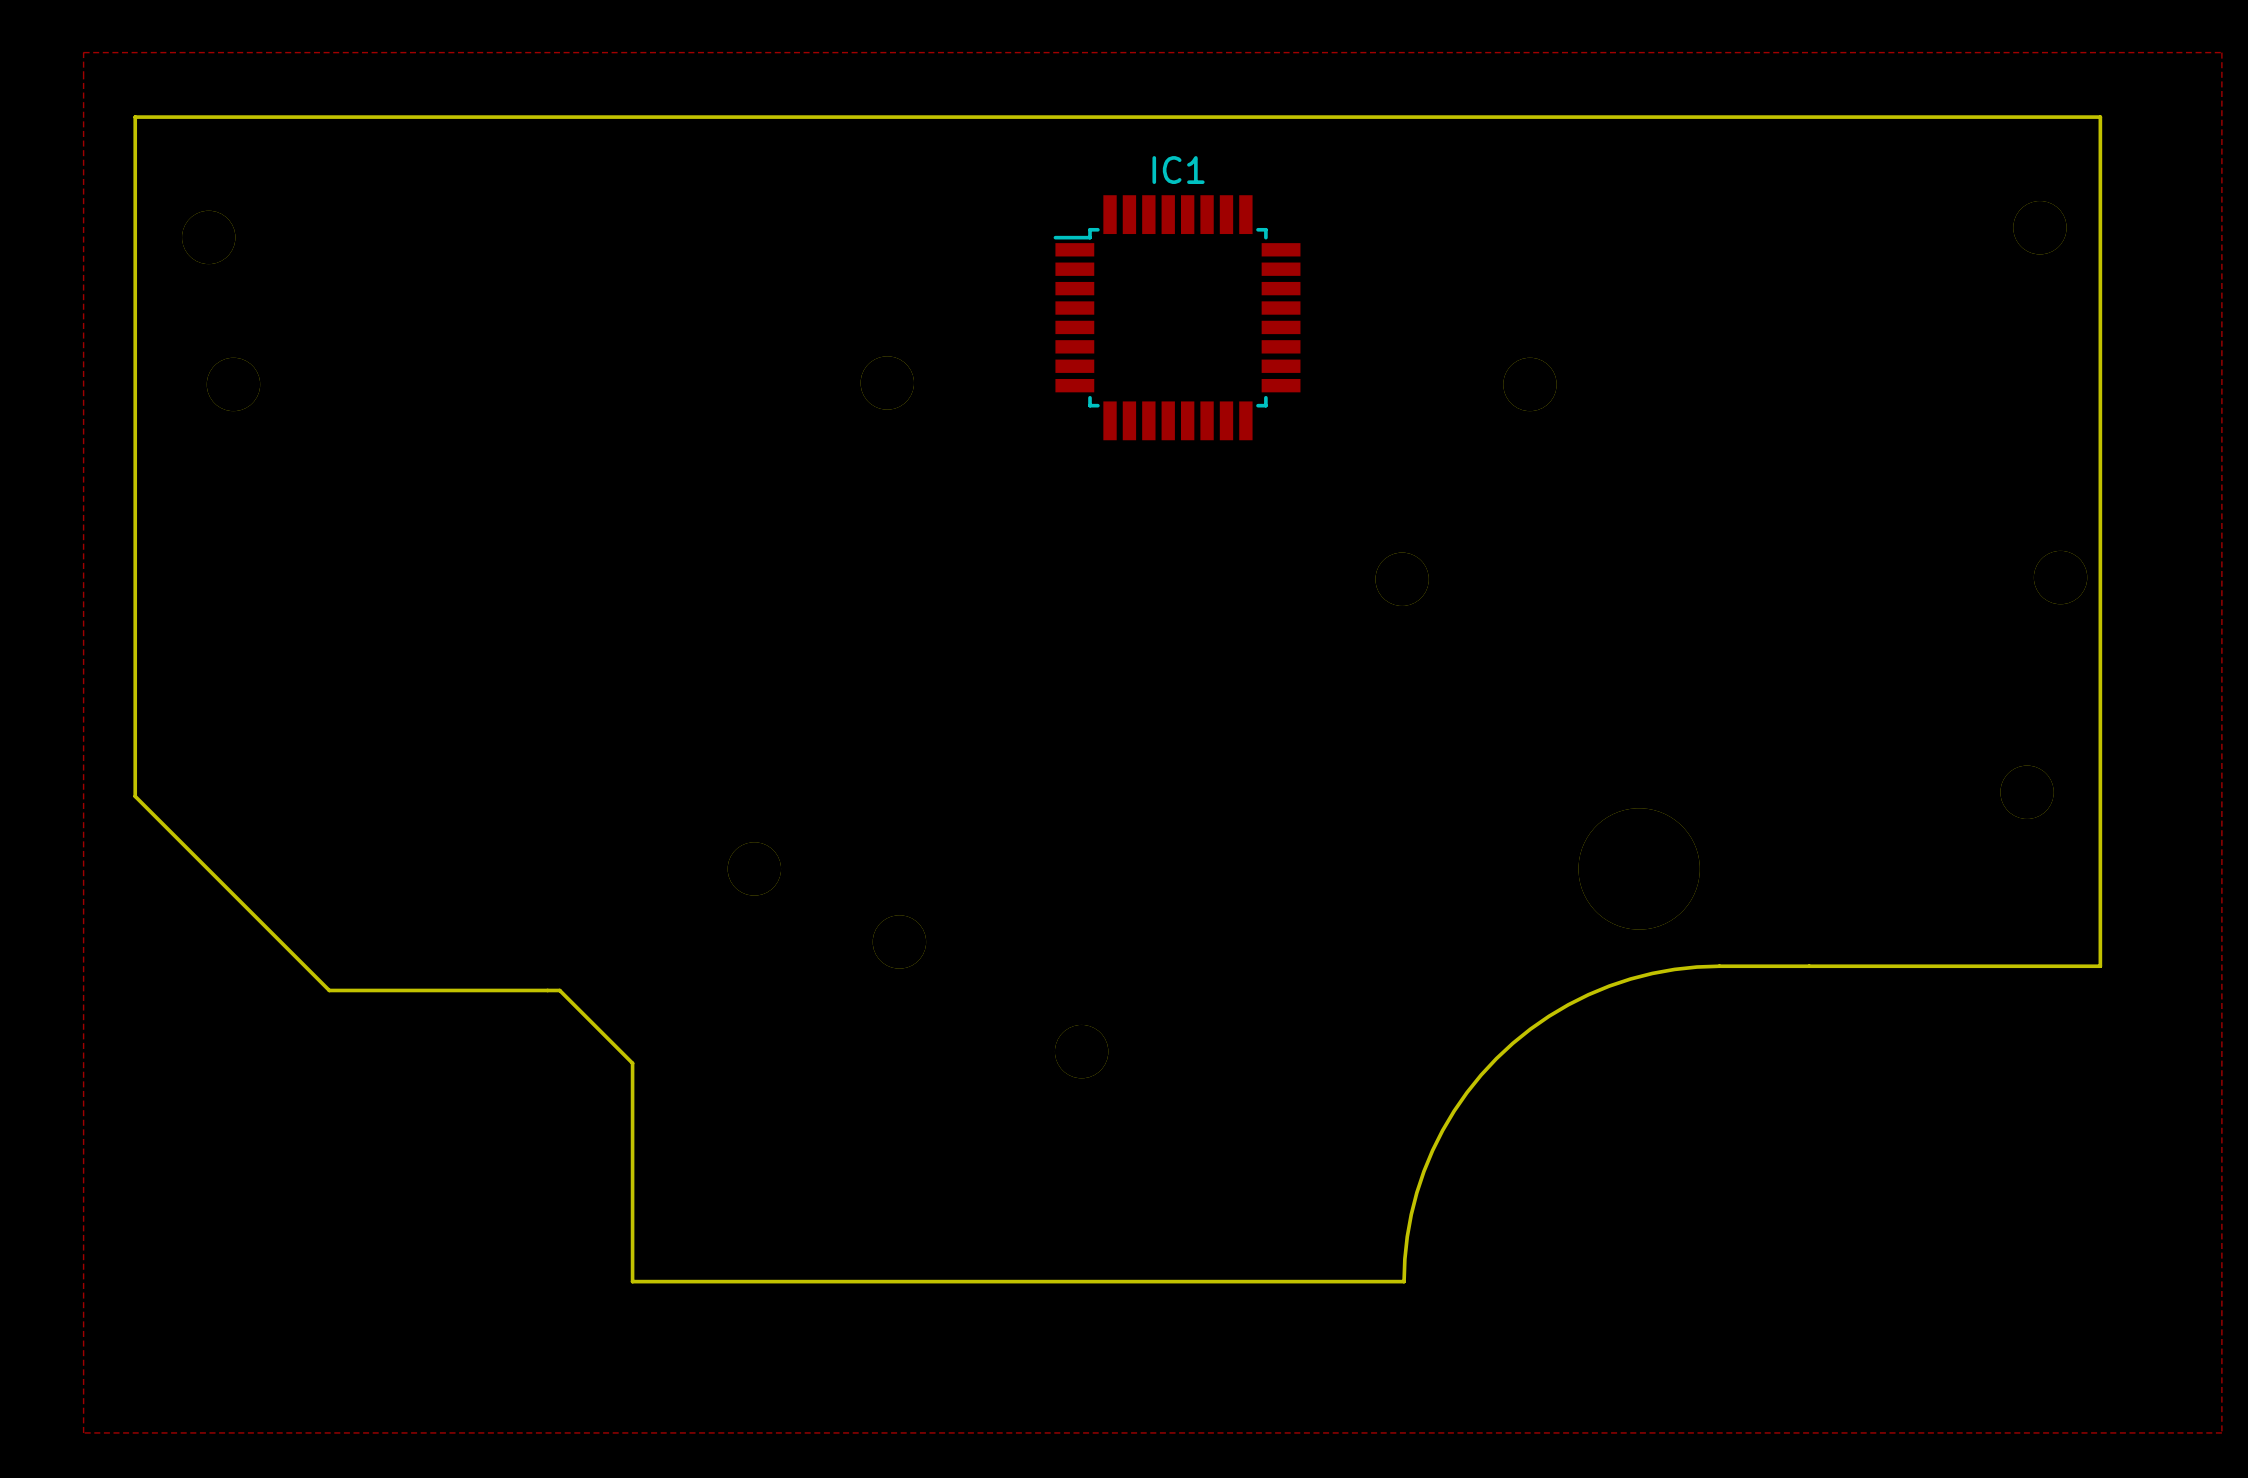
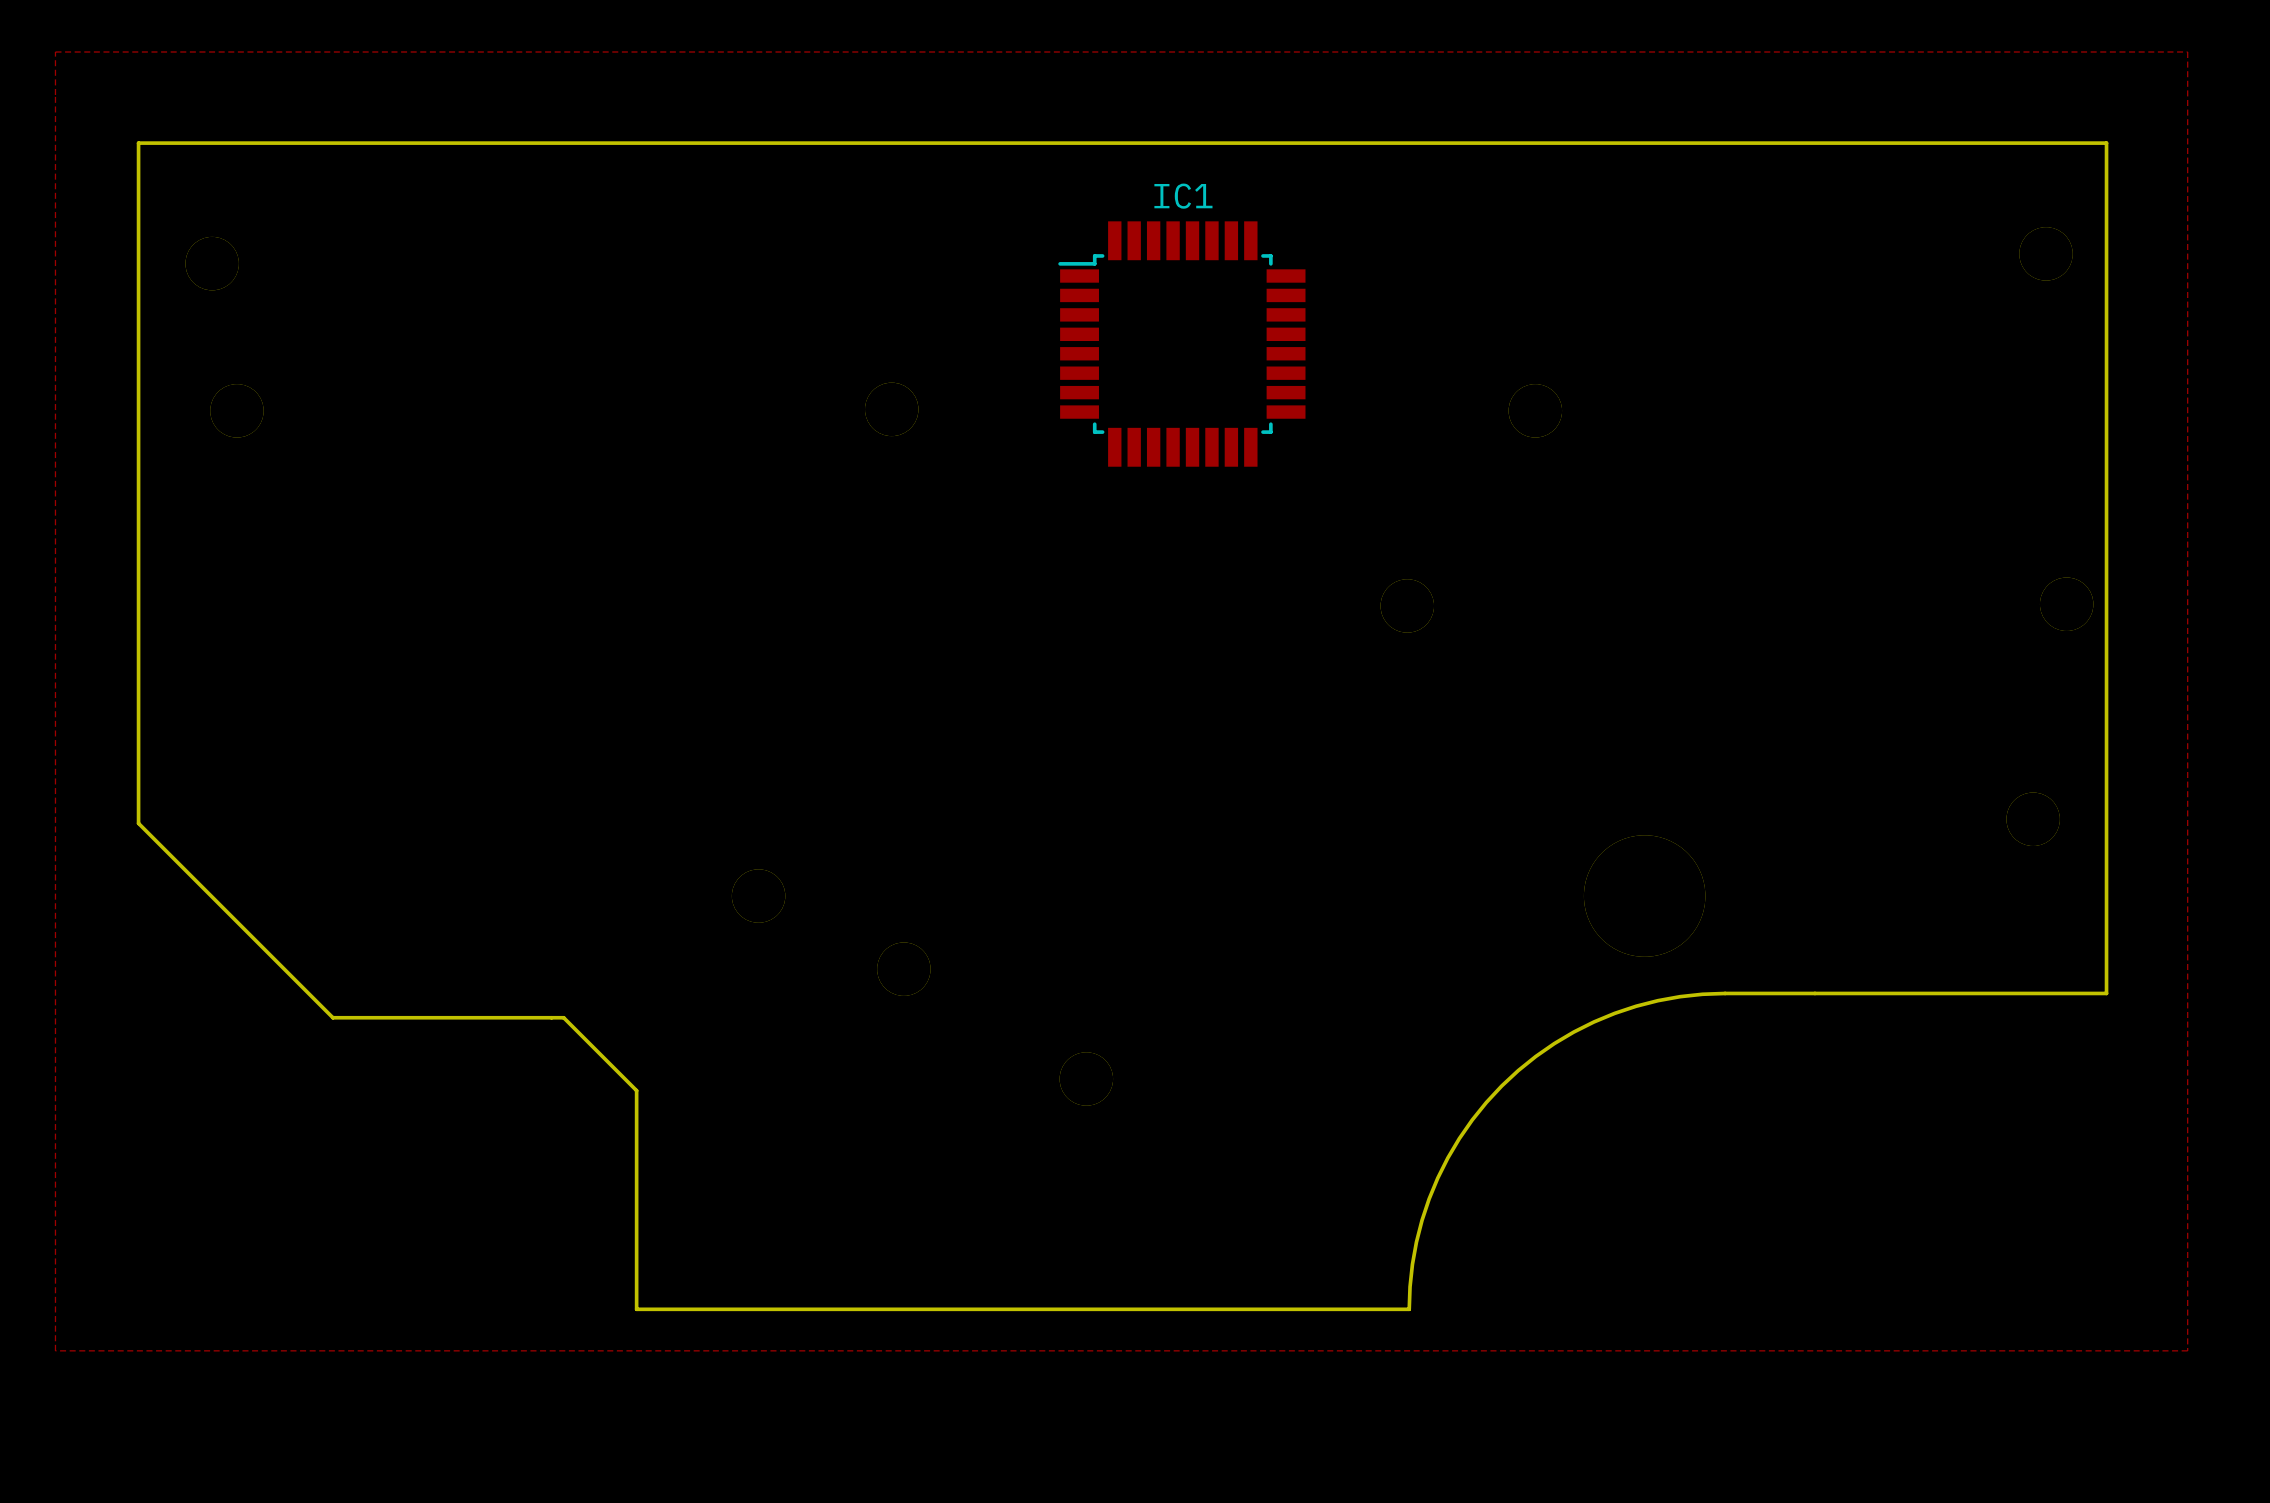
top zone outline: (83, 52) (2221, 52) (2221, 1432) (83, 1432) (83, 52) -> (55, 51) (55, 1350) (2187, 1350) (2187, 51) (55, 51)

